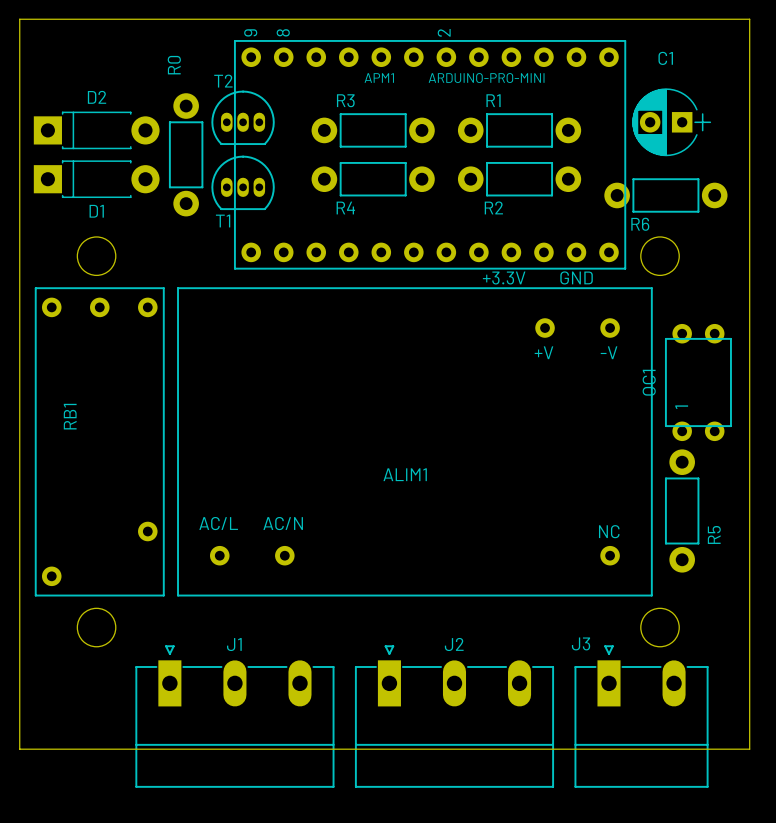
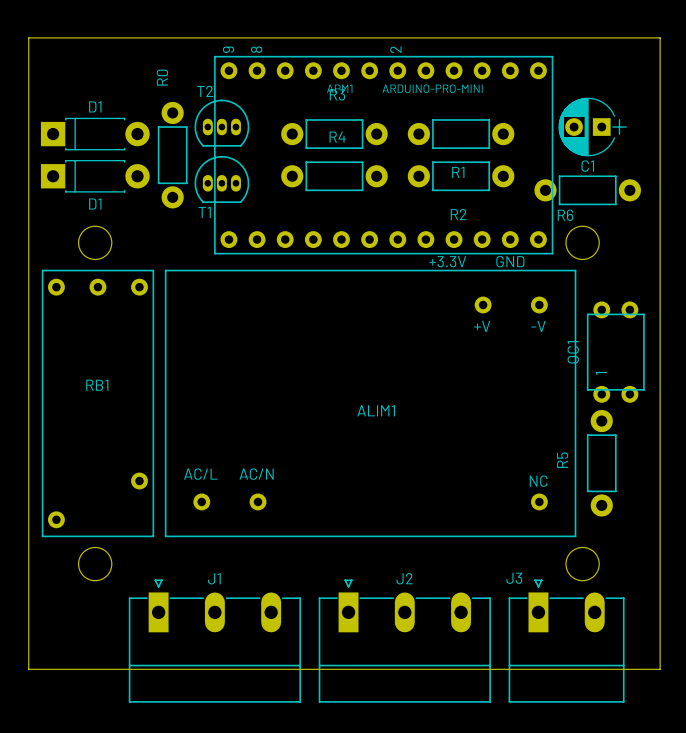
C1 name position: C1 (665, 58) -> C1 (587, 166)
D2 name: D2 (97, 97) -> D1 (95, 106)
R3 name position: R3 (345, 100) -> R3 (337, 94)
R1 name position: R1 (493, 100) -> R1 (458, 172)
R2 name position: R2 (493, 207) -> R2 (458, 214)
R4 name position: R4 (345, 208) -> R4 (337, 137)
RB1 name rotation: 0° (70, 416) -> 90° clockwise (97, 385)
ALIM1 name position: ALIM1 (405, 474) -> ALIM1 (376, 410)
R5 name position: R5 (714, 534) -> R5 (562, 460)

